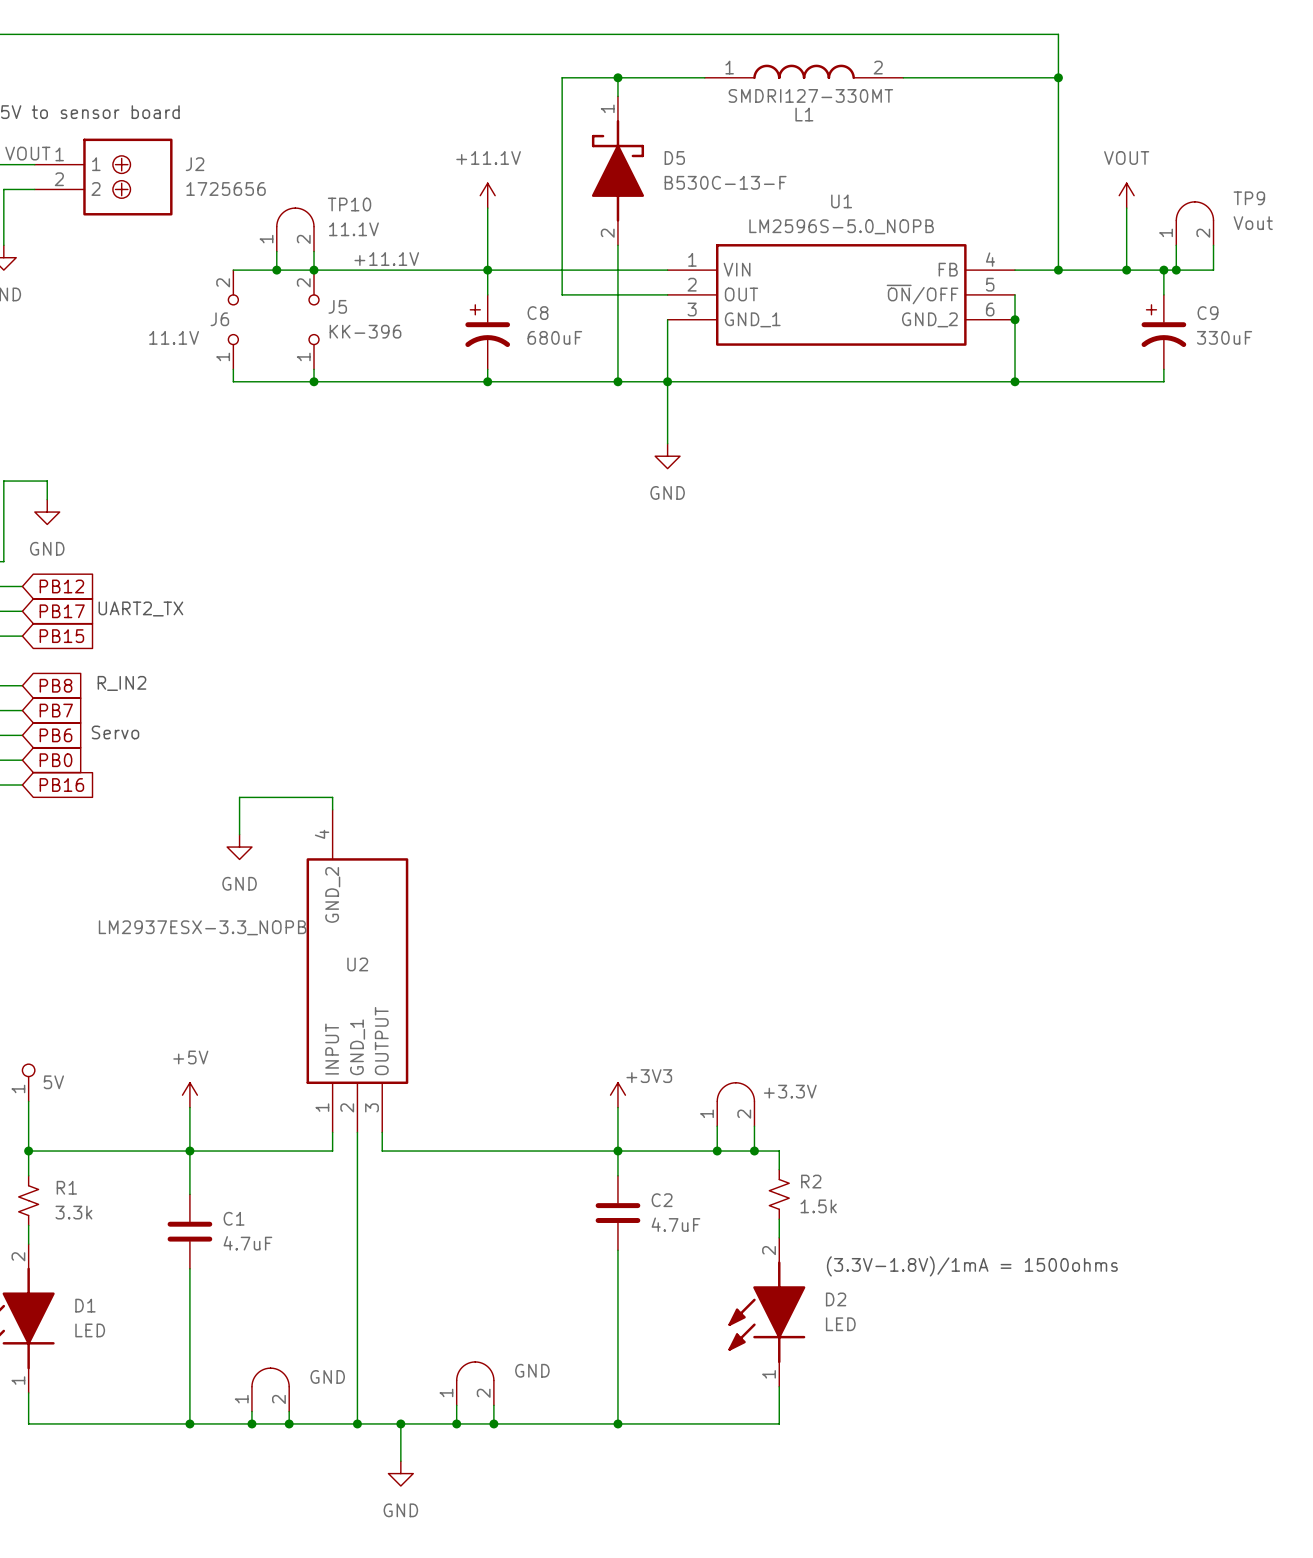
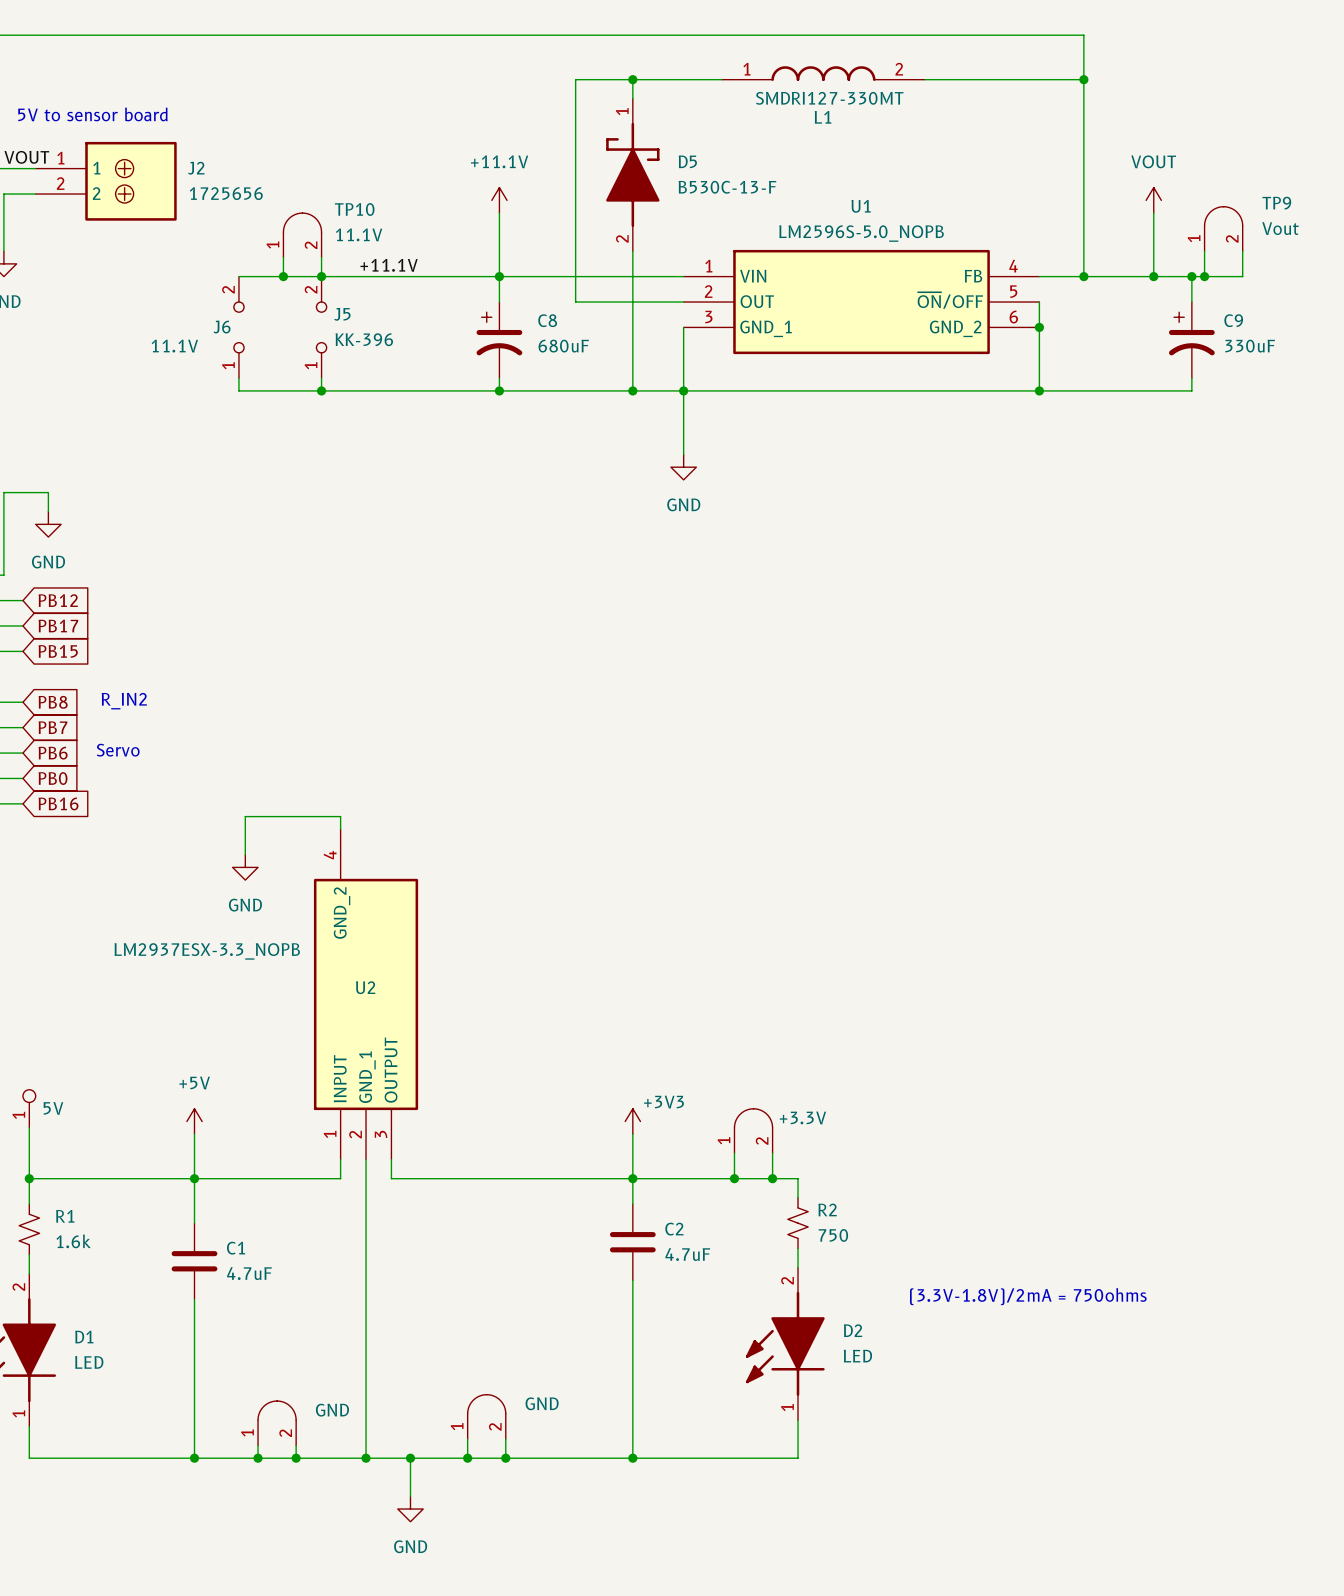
text: UART2_TX (140, 608) -> none
R2 value: 1.5k (818, 1206) -> 750 (833, 1235)
R1 value: 3.3k (73, 1212) -> 1.6k (73, 1241)
text: (3.3V-1.8V)/1mA = 1500ohms (972, 1266) -> (3.3V-1.8V)/2mA = 750ohms (1028, 1296)

